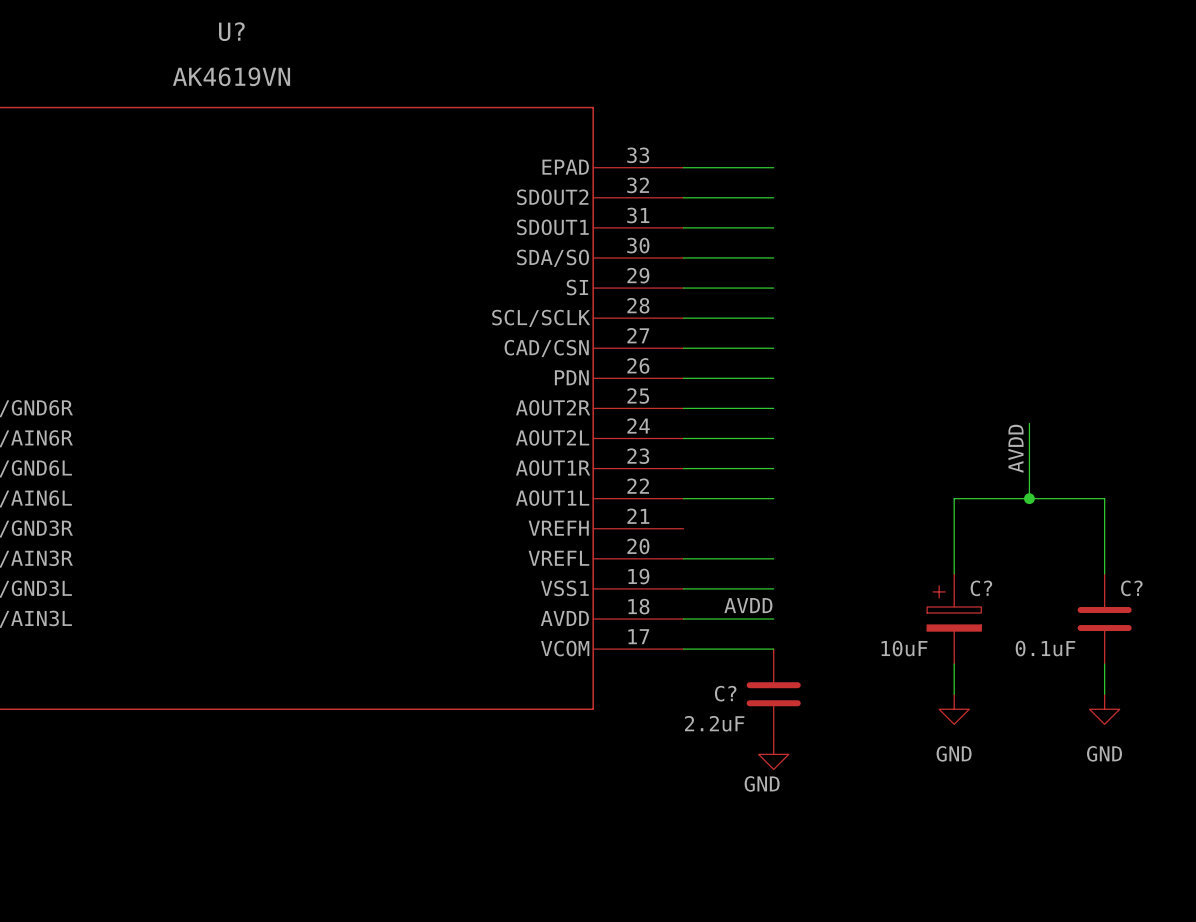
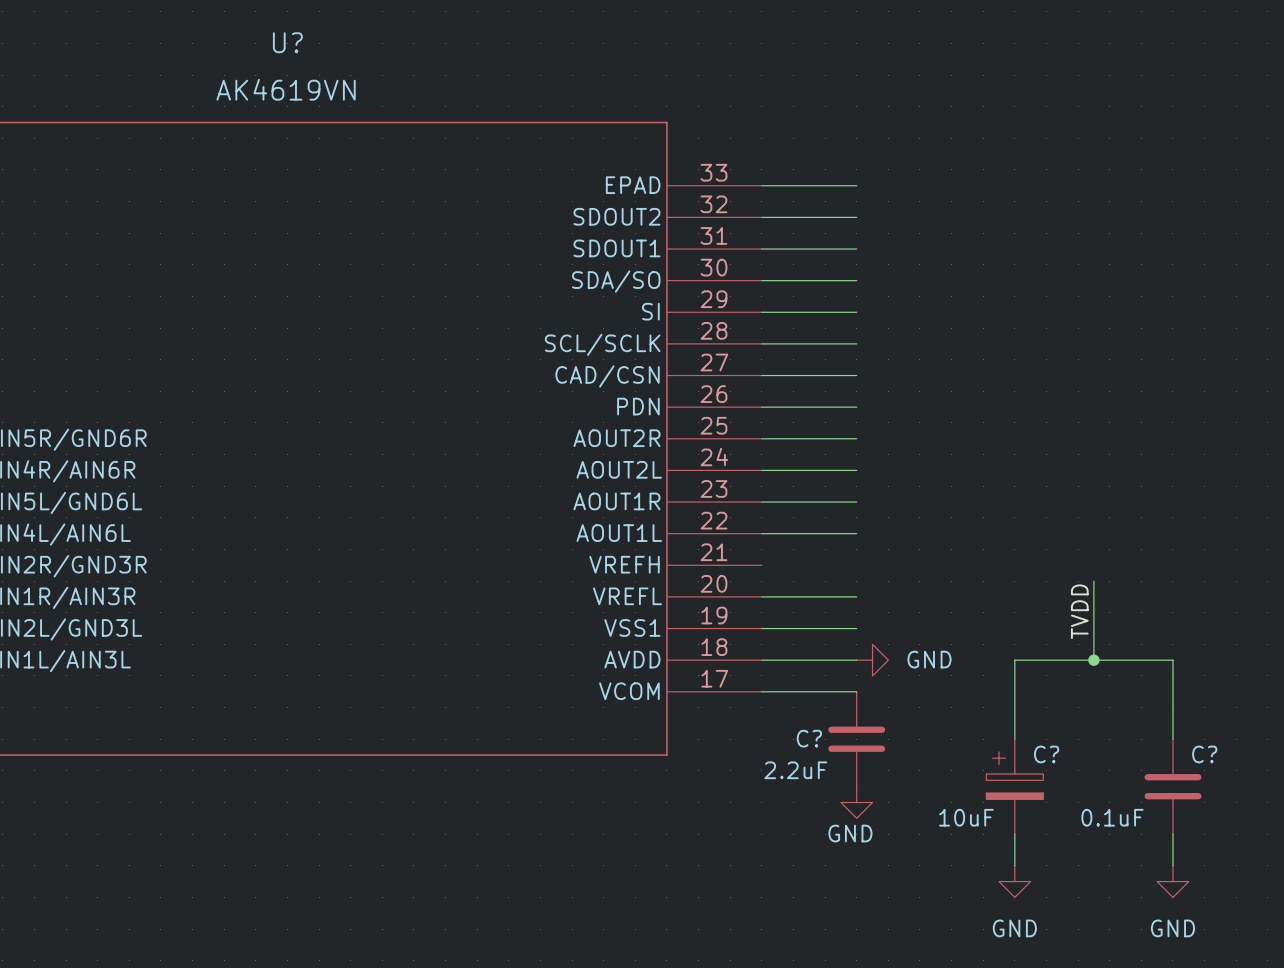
wire: (1029, 423) (1029, 498) -> (1093, 581) (1093, 660)
label: AVDD (1016, 448) -> none
junction: (1029, 498) -> none
label: none -> TVDD (1079, 611)
wire: (954, 573) (954, 498) (1104, 498) (1104, 573) -> (1014, 739) (1014, 660) (1172, 660) (1172, 739)
label: AVDD (748, 605) -> none
power symbol: none -> GND (872, 660)
C? position: (954, 619) -> (1014, 786)
junction: none -> (1093, 660)
C? position: (1104, 619) -> (1172, 786)
wire: (954, 664) (954, 694) -> (1014, 834) (1014, 865)
wire: (1104, 664) (1104, 694) -> (1172, 834) (1172, 865)
power symbol: GND (954, 709) -> none
power symbol: GND (1104, 709) -> none
power symbol: none -> GND (1014, 881)
power symbol: none -> GND (1172, 881)

